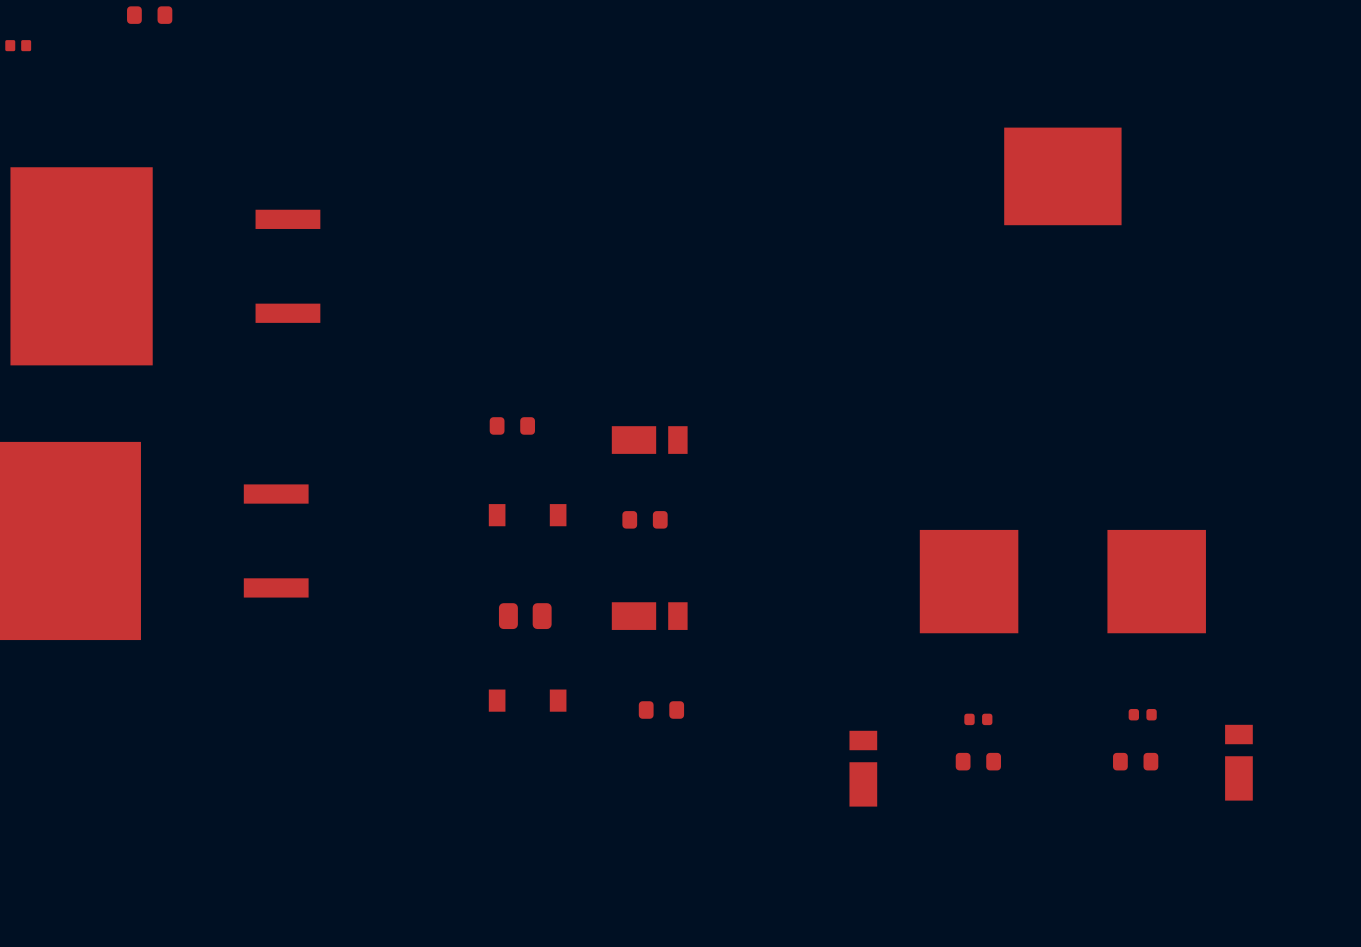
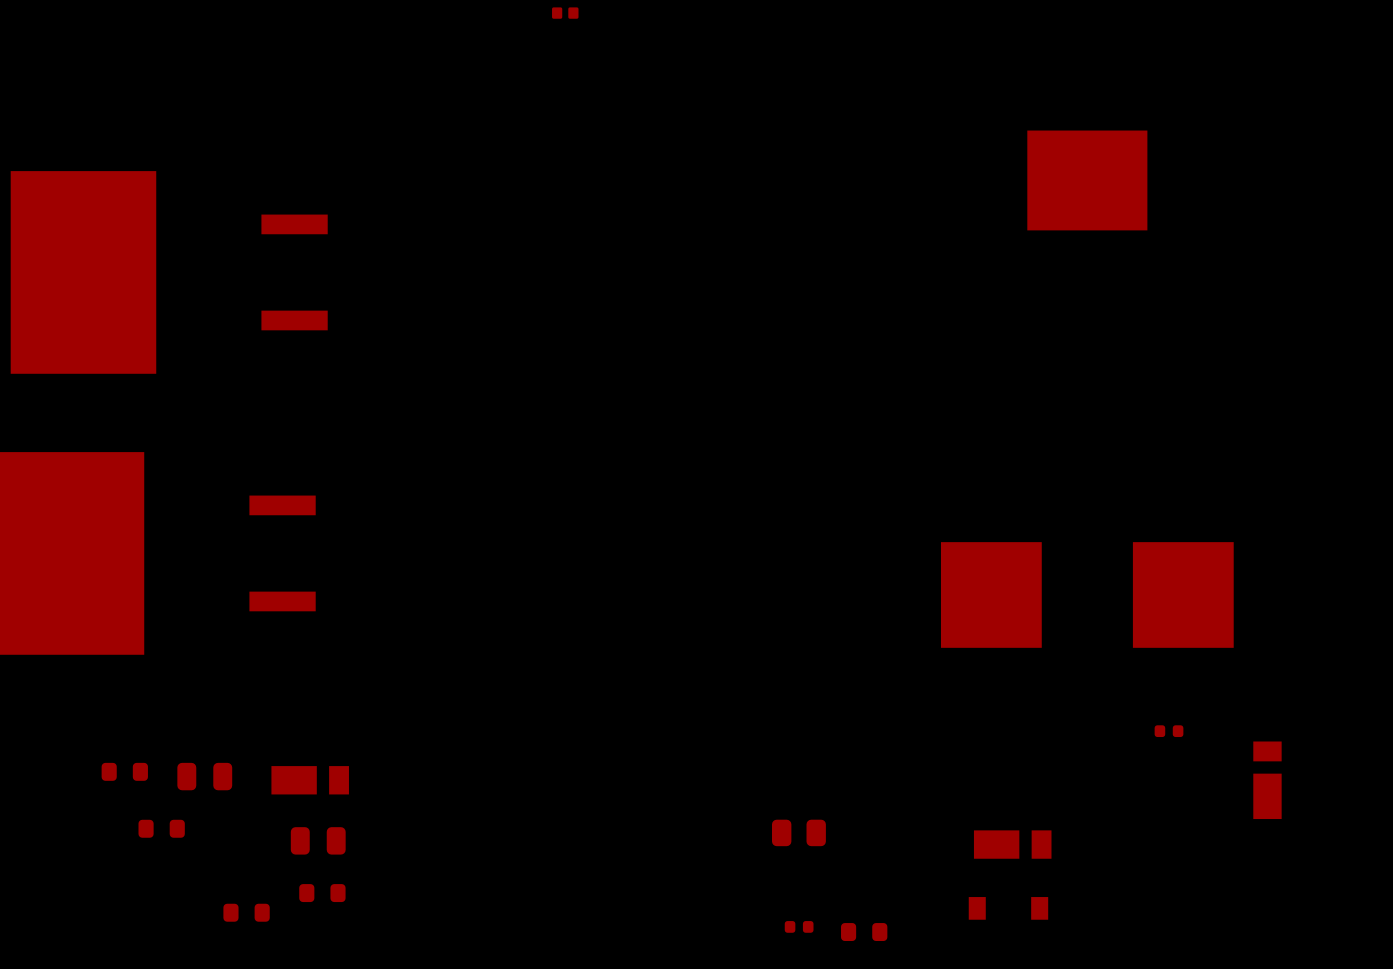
part: none -> (565, 13)
part: (149, 15) -> none
part: (18, 45) -> none
part: (512, 425) -> none
part: (649, 440) -> none
part: (527, 515) -> none
part: (645, 519) -> none
part position: (525, 616) -> (798, 832)
part: (649, 616) -> none
part: (527, 700) -> none
part: (661, 710) -> none
part position: (978, 719) -> (799, 926)
part: none -> (124, 771)
part: none -> (204, 776)
part: (978, 761) -> none
part: (1135, 761) -> none
part: none -> (310, 780)
part rotation: 0° (863, 768) -> 90° clockwise (1012, 844)
part position: (863, 768) -> (1012, 844)
part: none -> (161, 828)
part: none -> (318, 840)
part: none -> (322, 893)
part: none -> (1008, 908)
part: none -> (246, 912)
part: none -> (864, 932)

